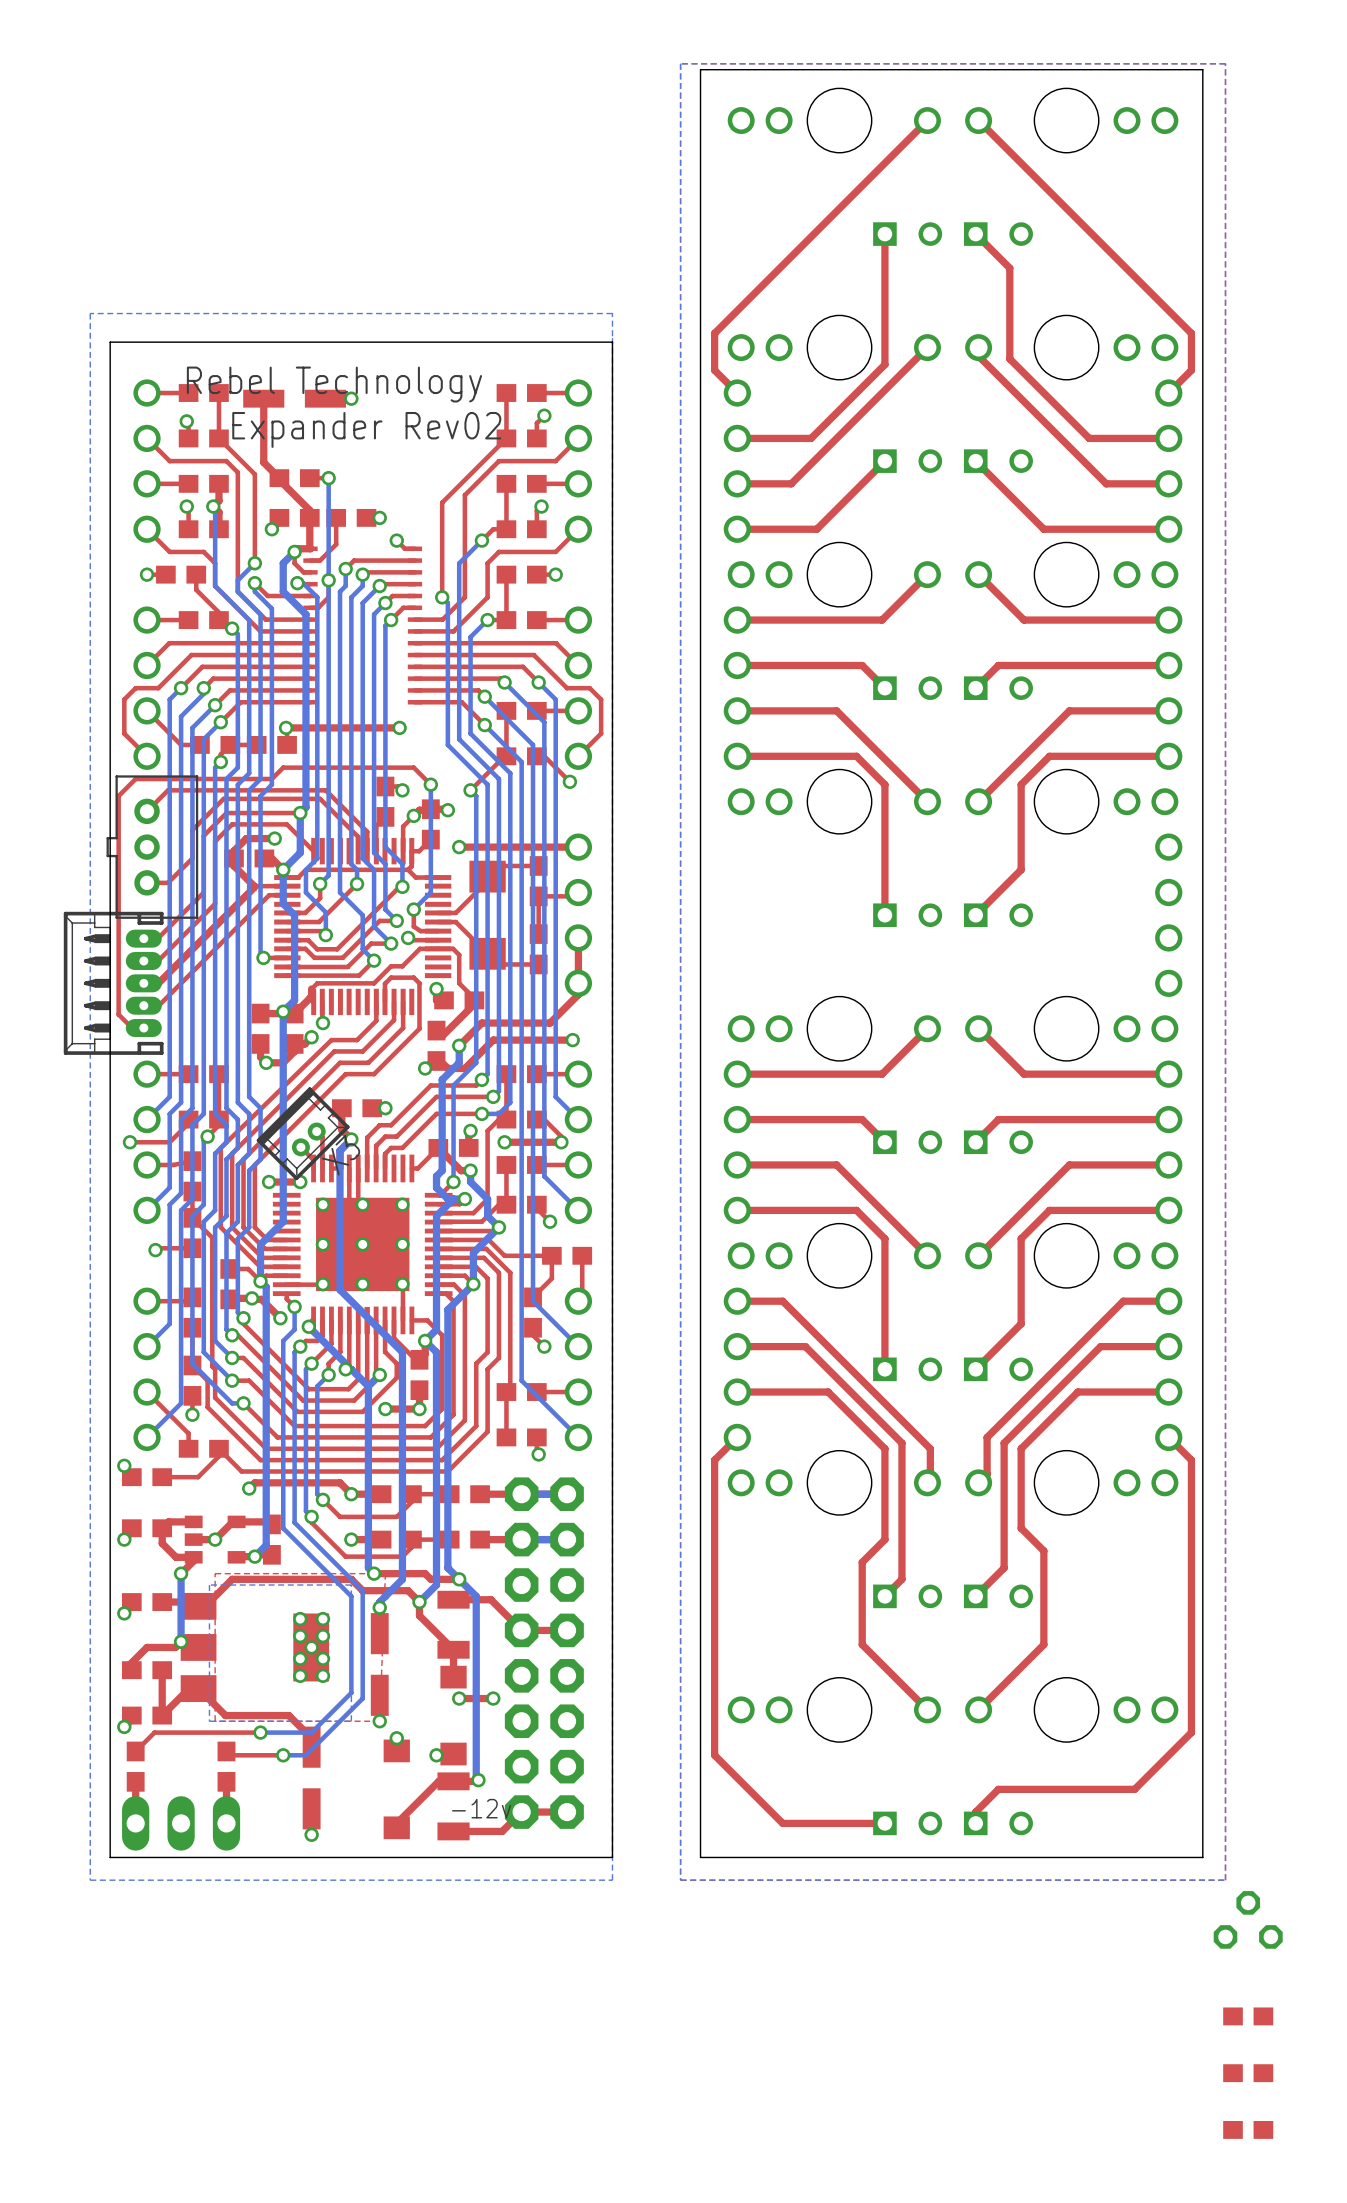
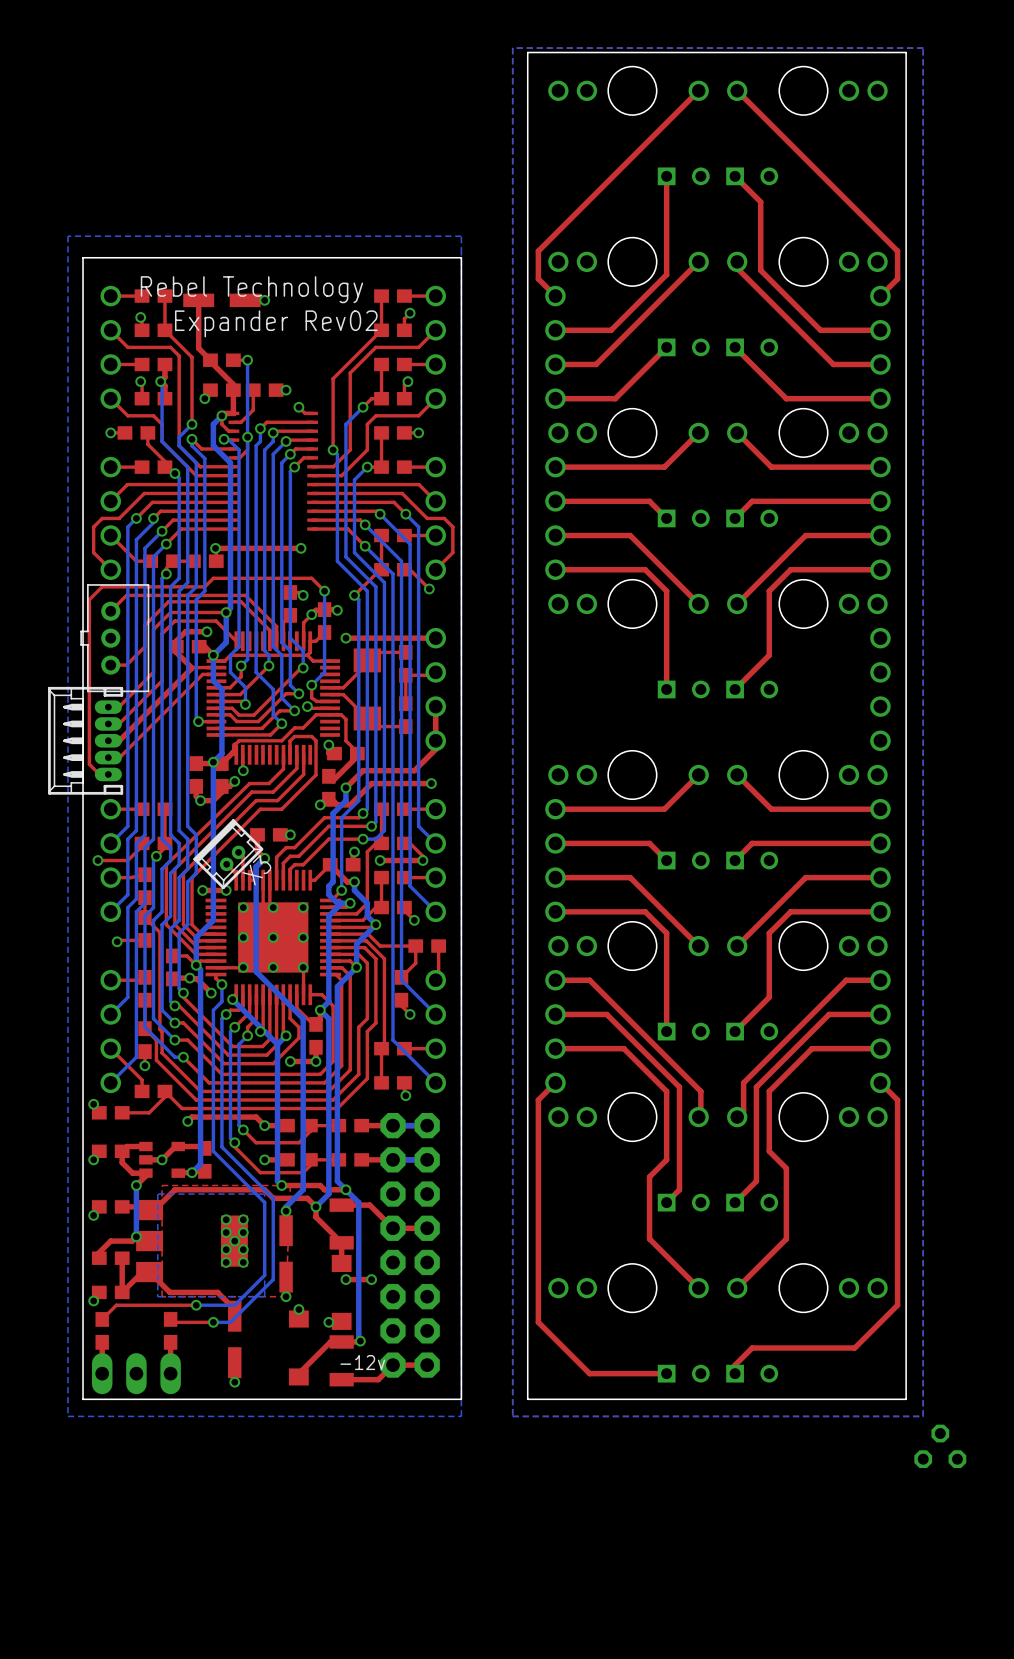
part: (1248, 2016) -> none
part: (1248, 2073) -> none
part: (1248, 2129) -> none

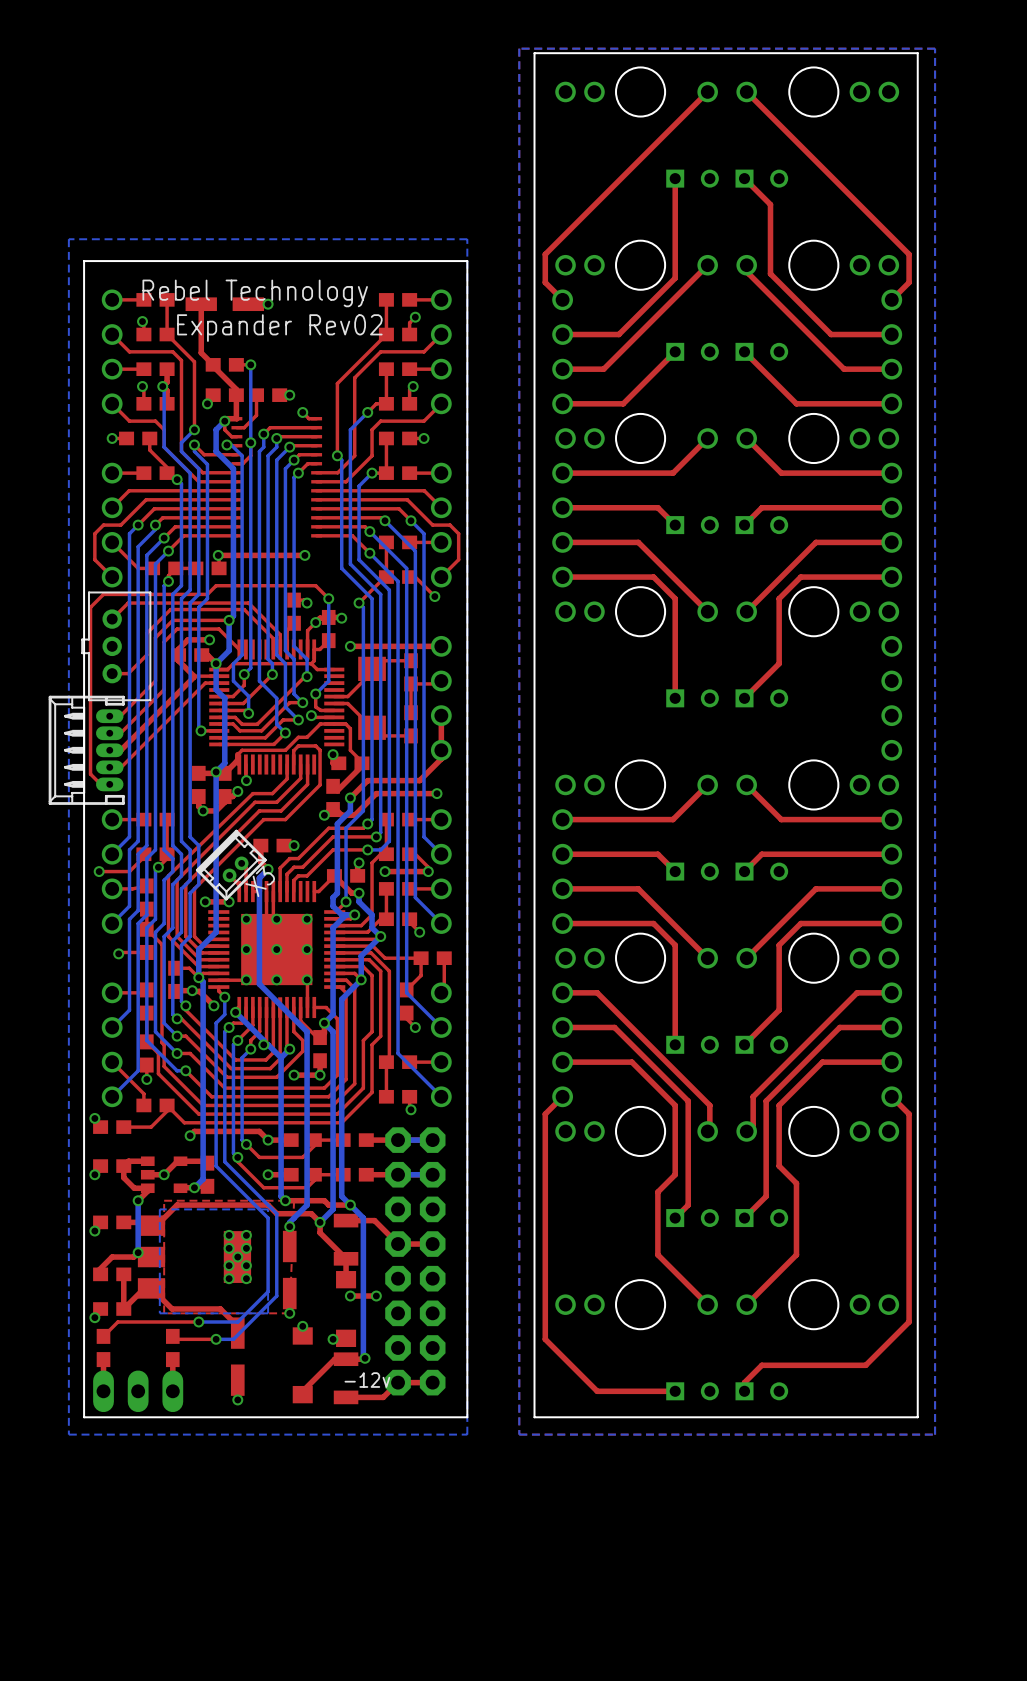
part: (940, 1446) -> none

